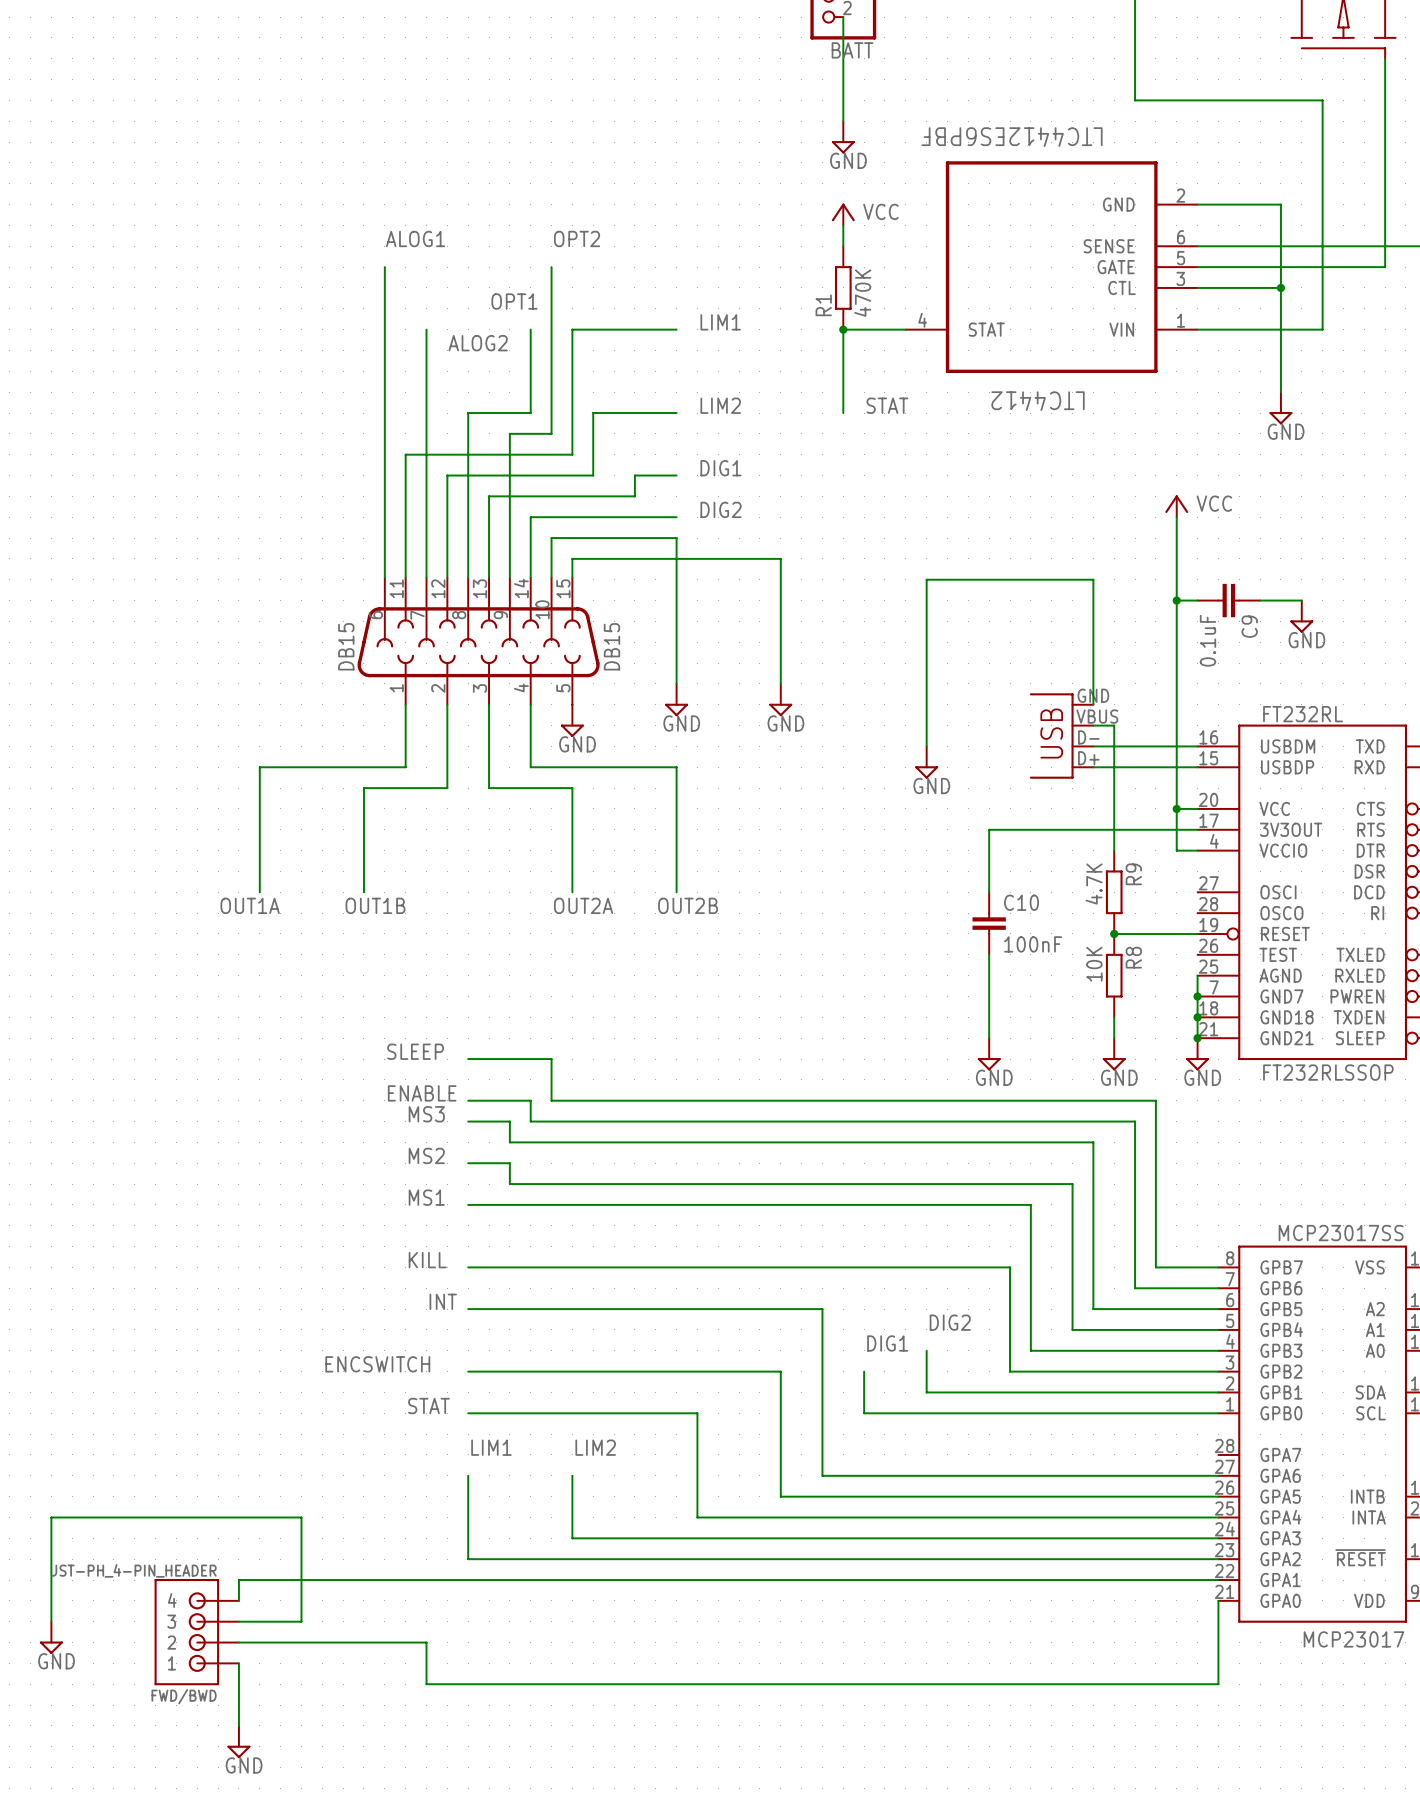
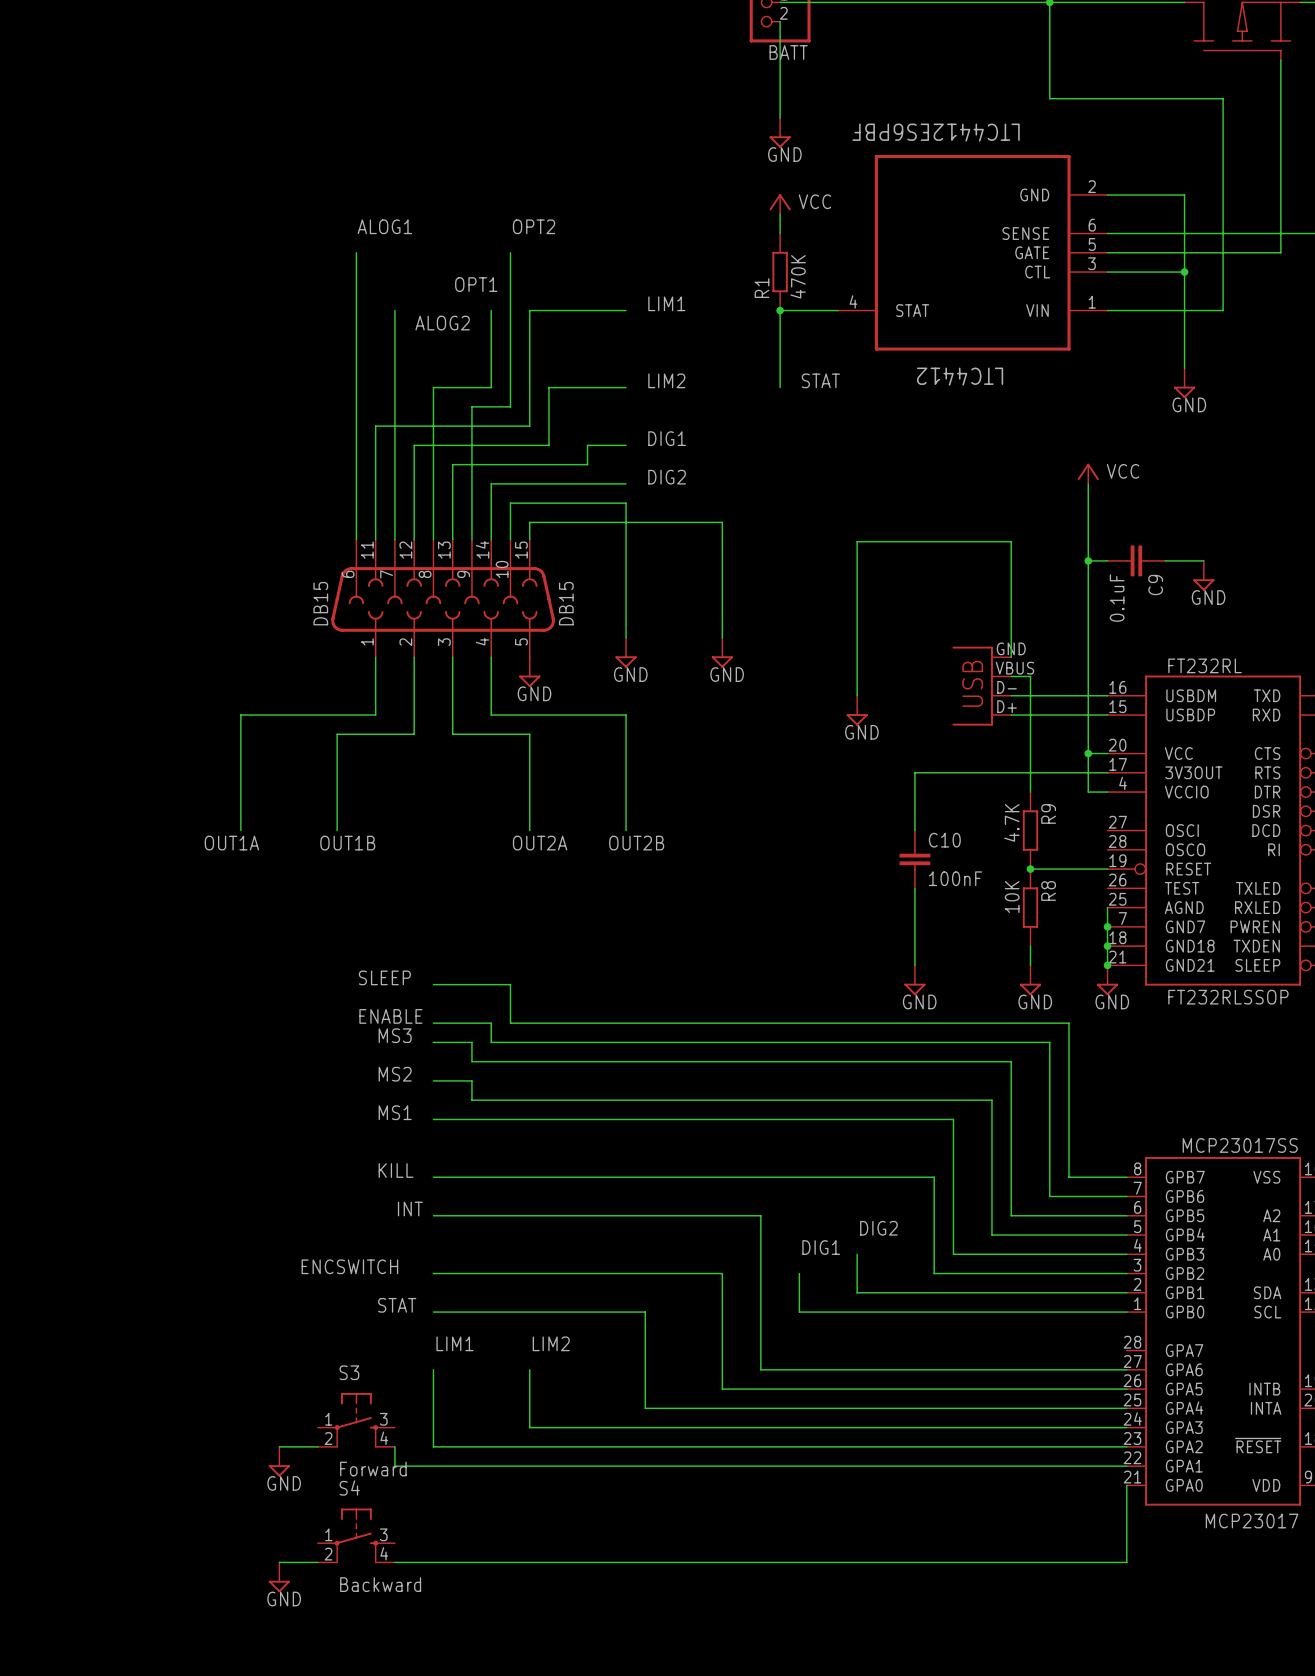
S3: none -> Forward (356, 1420)
wire: none -> (279, 1446) (317, 1446)
power symbol: none -> GND (279, 1461)
wire: (426, 1580) (238, 1580) (238, 1600) -> (394, 1466) (394, 1446)
wire: (51, 1621) (51, 1517) (301, 1517) (301, 1621) (238, 1621) -> none
FWD/BWD: JST-PH_4-PIN_HEADER (196, 1632) -> none
power symbol: GND (51, 1637) -> none
wire: (238, 1642) (426, 1642) (426, 1684) -> none
S4: none -> Backward (356, 1535)
wire: (238, 1663) (238, 1725) -> none
wire: none -> (279, 1562) (317, 1562)
power symbol position: GND (238, 1742) -> GND (279, 1577)

